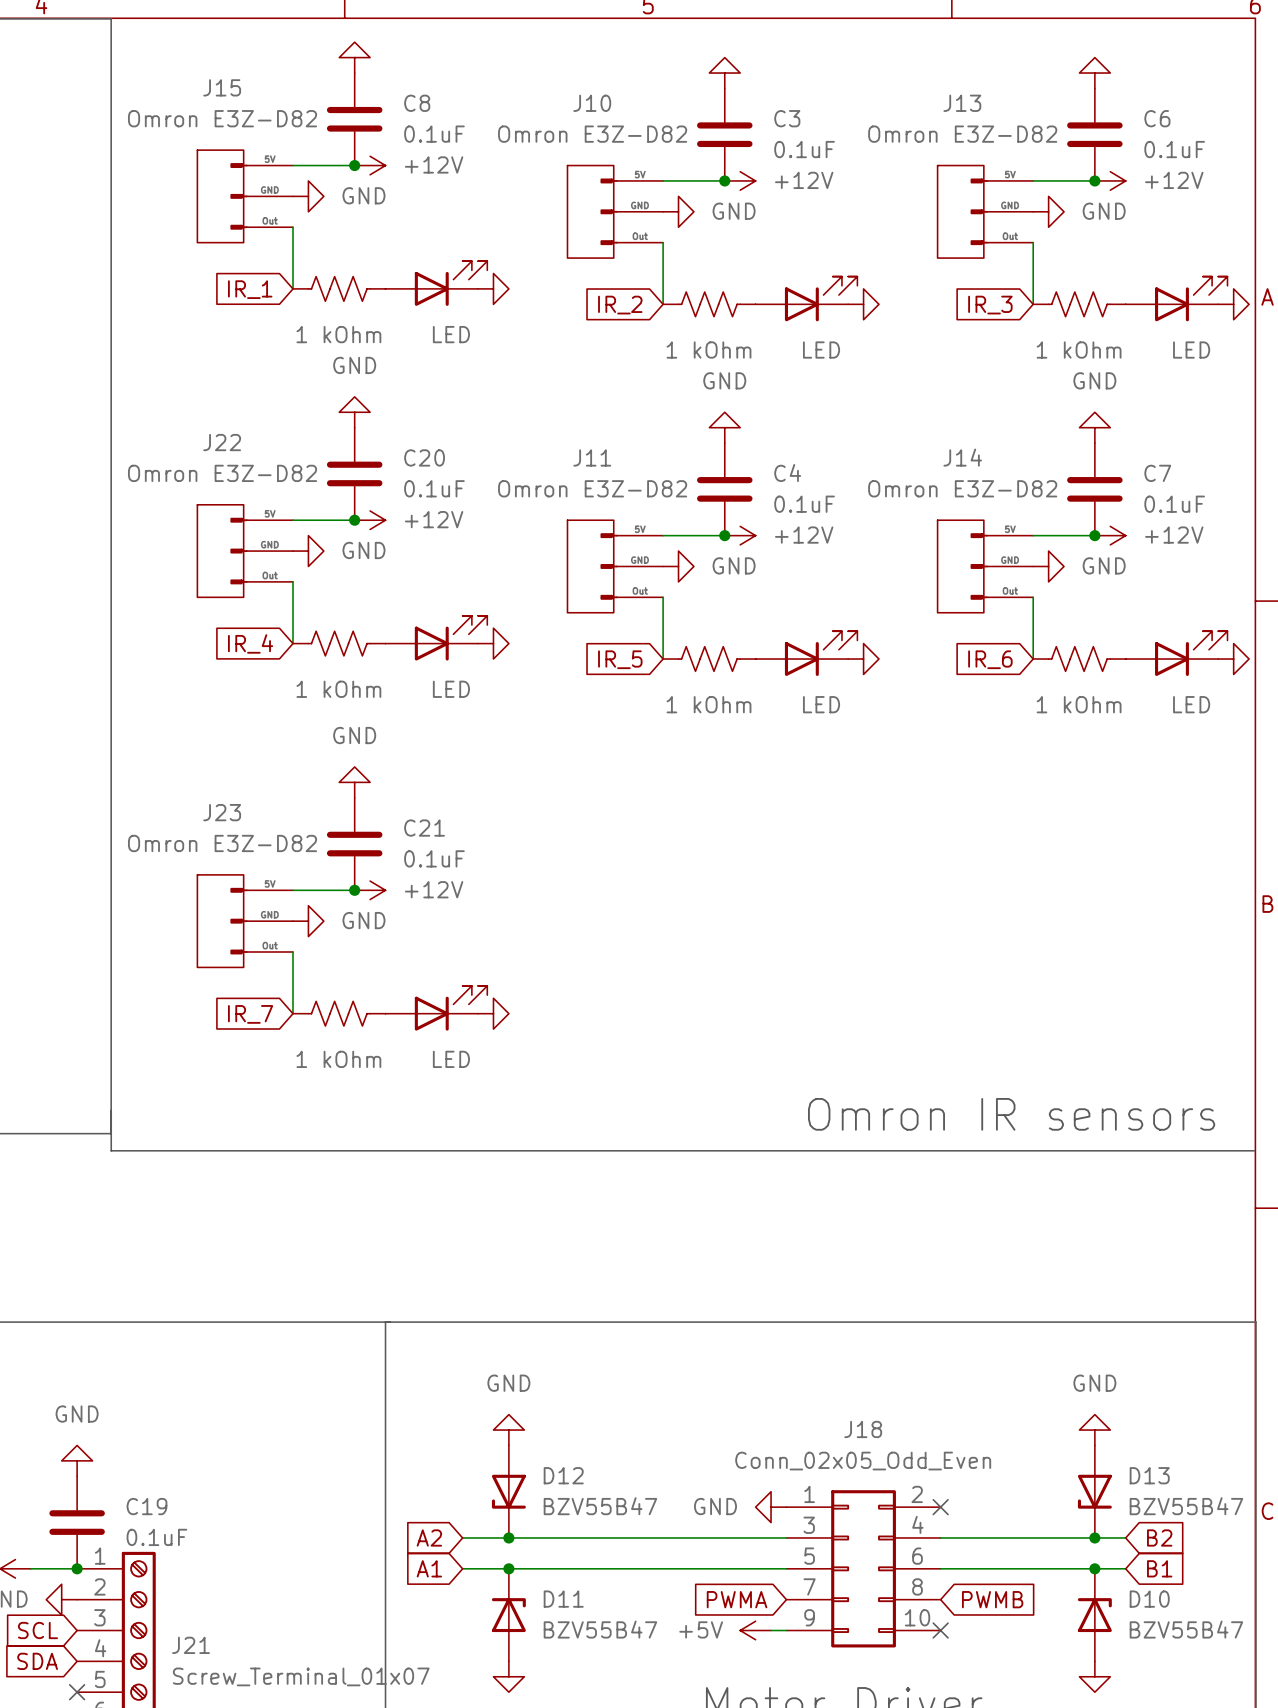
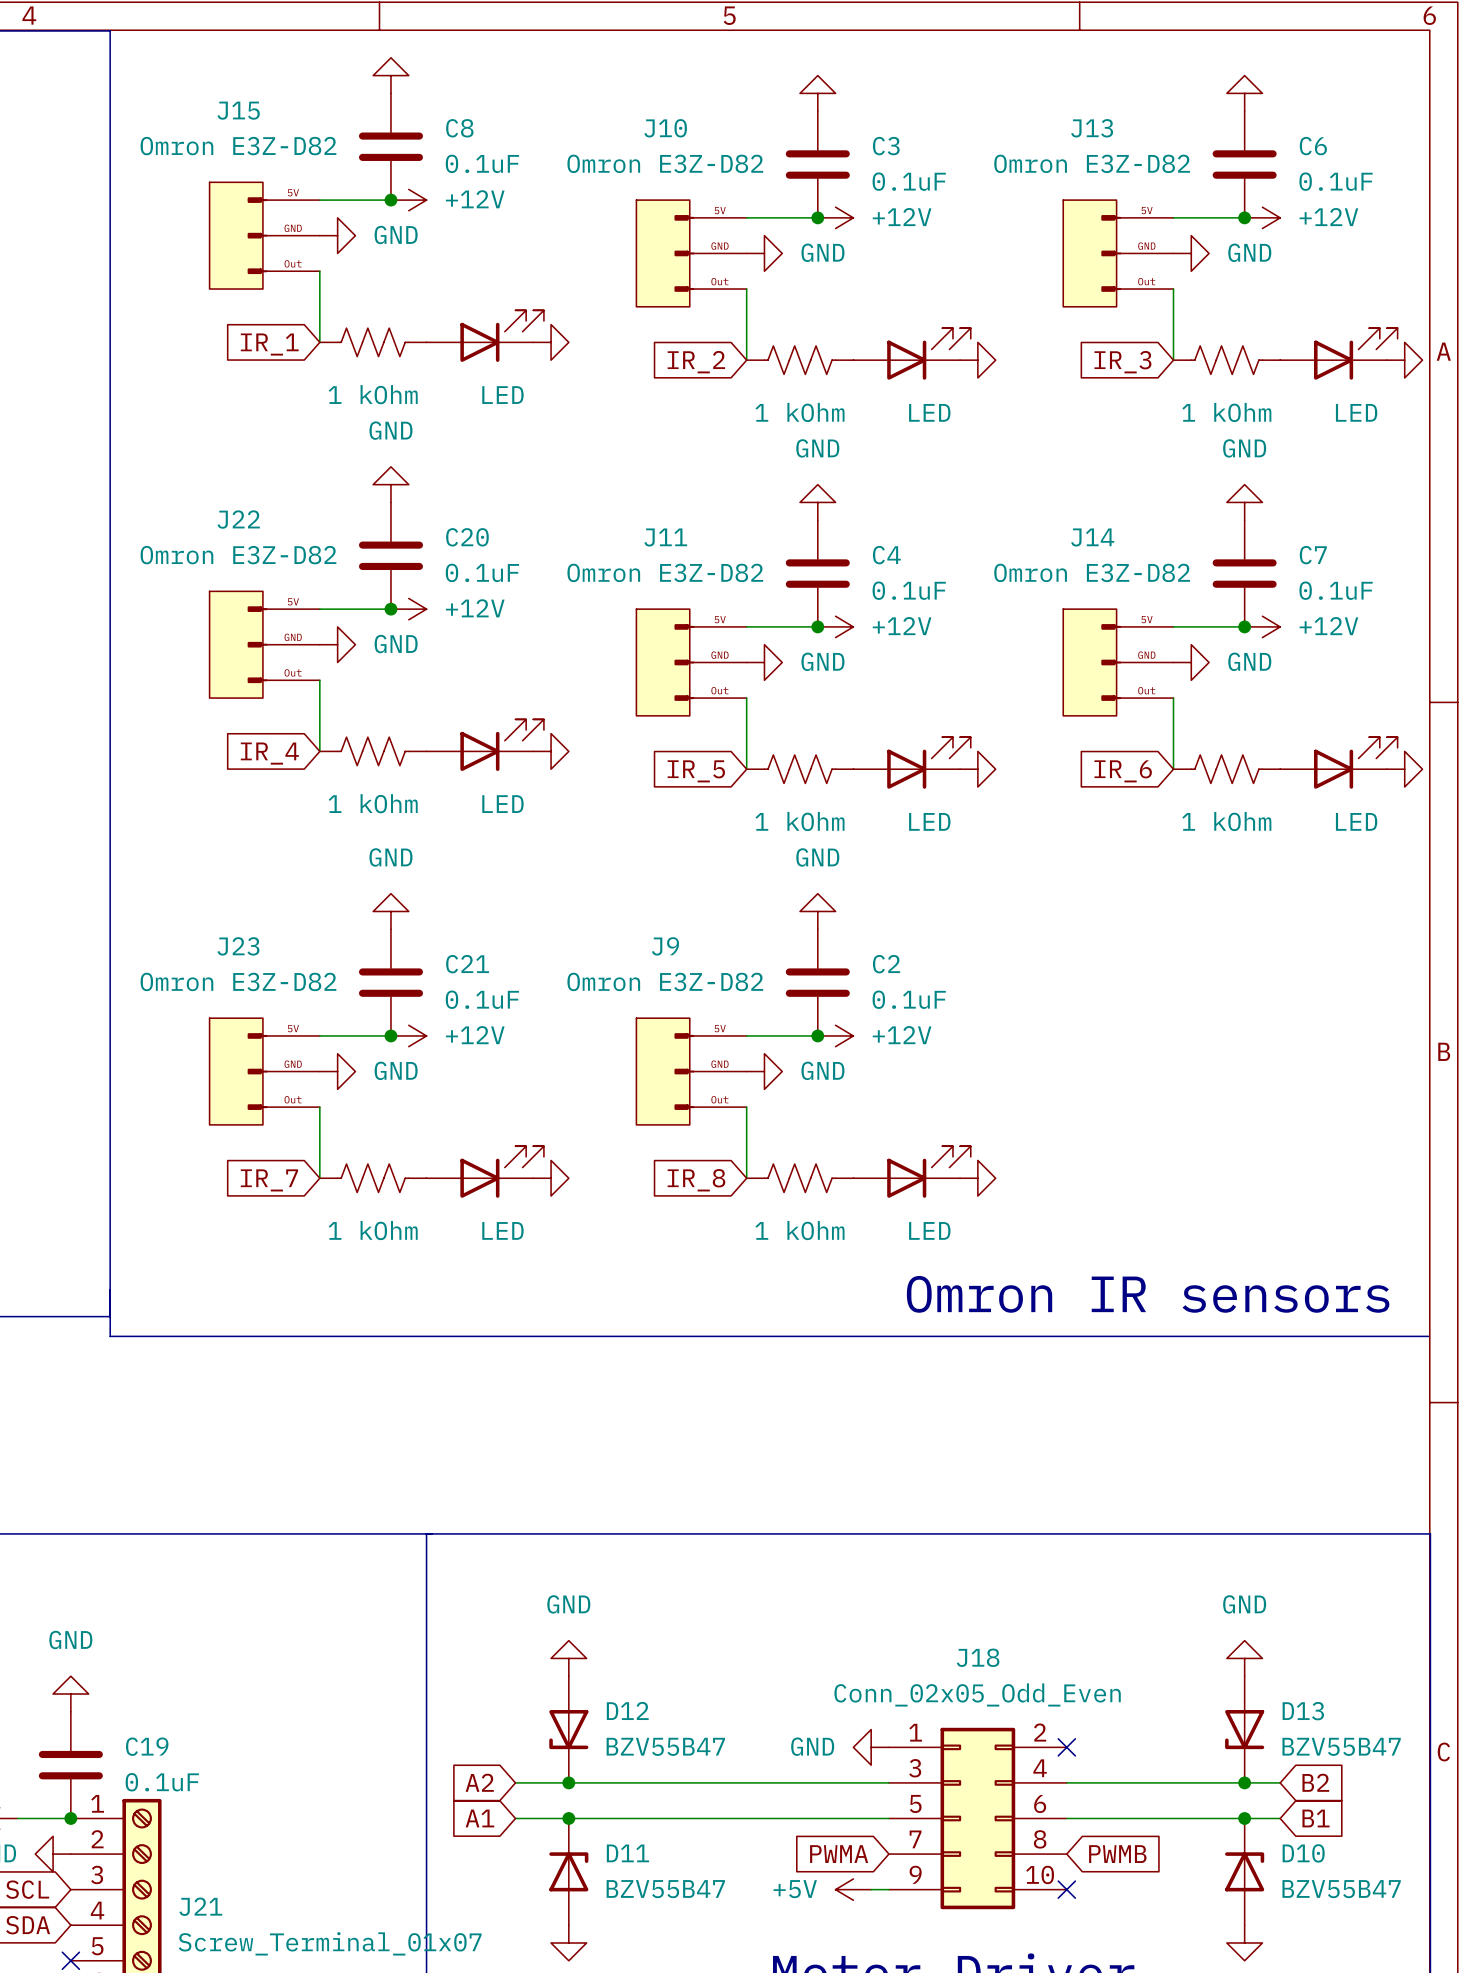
power symbol: none -> GND (817, 911)
C2: none -> 0.1uF (817, 982)
wire: none -> (746, 1035) (817, 1035)
junction: none -> (817, 1035)
power symbol: none -> +12V (835, 1035)
J9: none -> Omron E3Z-D82 (691, 1071)
power symbol: none -> GND (764, 1071)
wire: none -> (746, 1107) (746, 1178)
part: none -> LED (912, 1172)
part: none -> 1 kOhm (800, 1178)
power symbol: none -> (977, 1178)
global label: none -> IR_8 (696, 1180)

